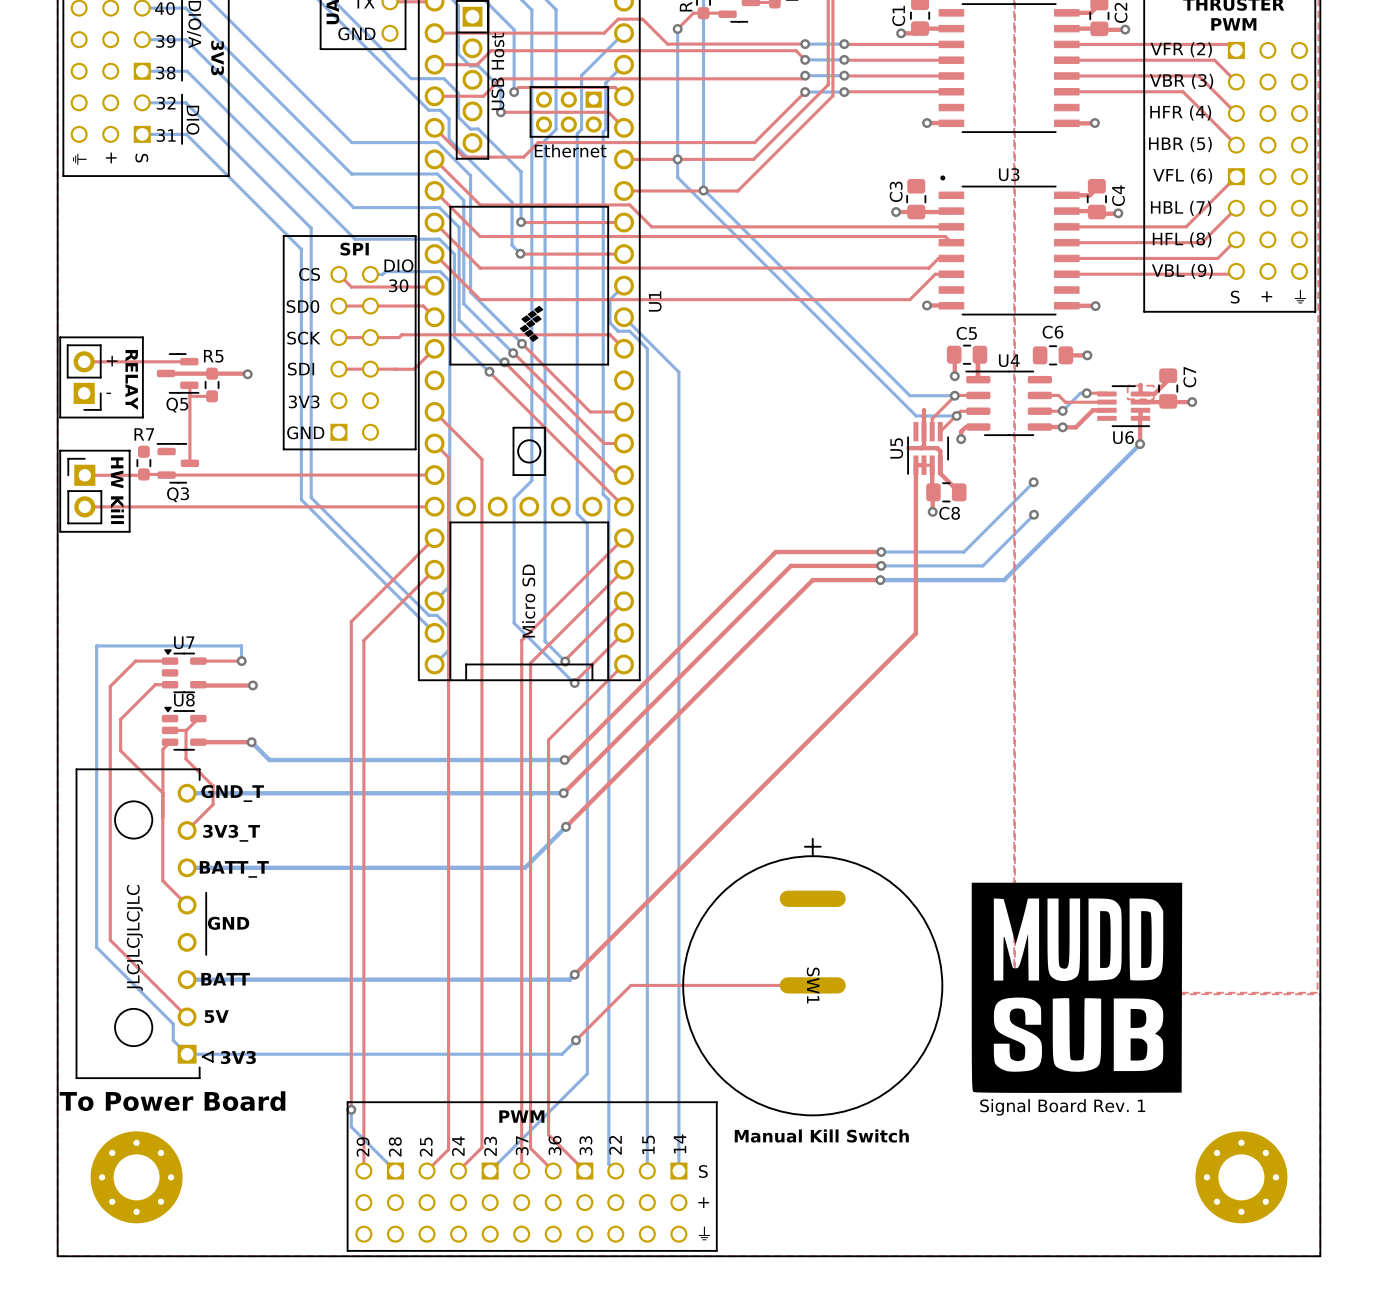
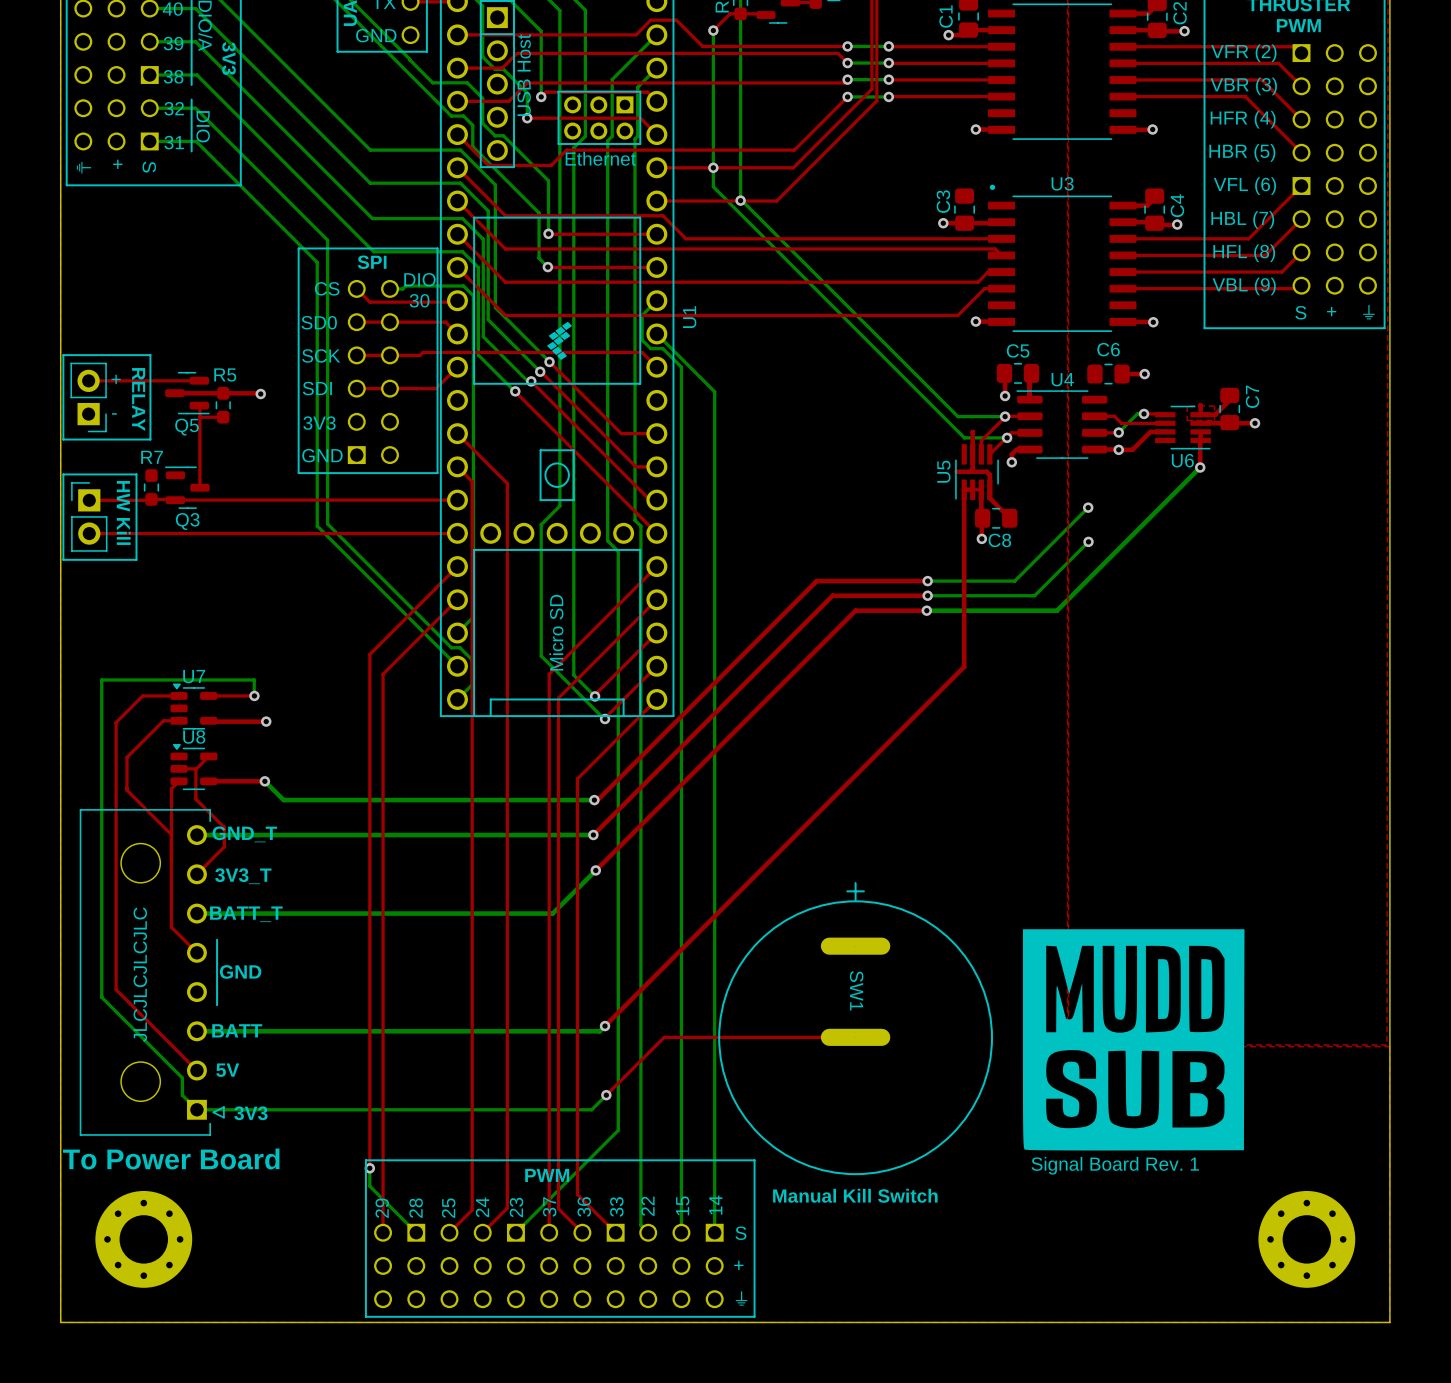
SW1 name position: SW1 (813, 985) -> SW1 (856, 990)

